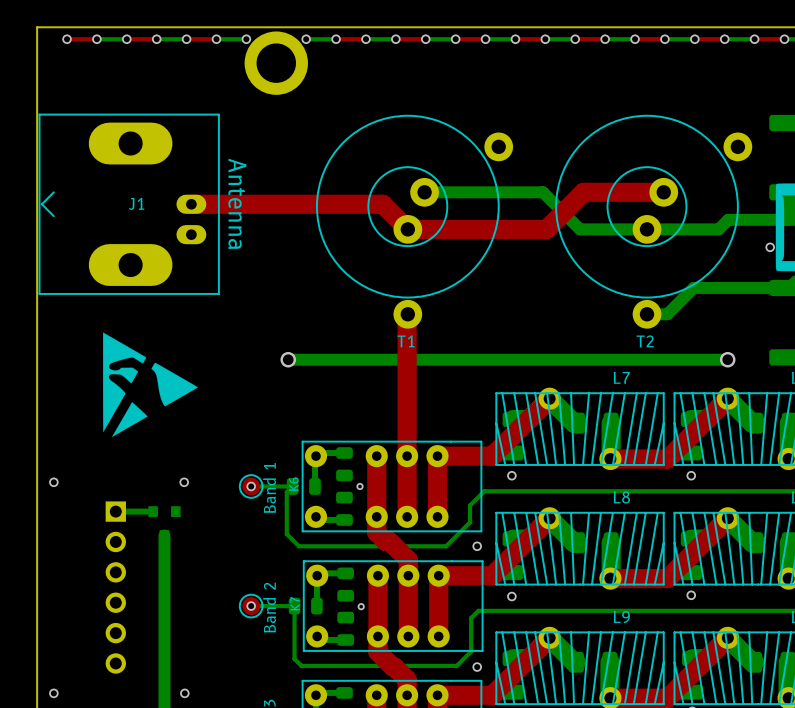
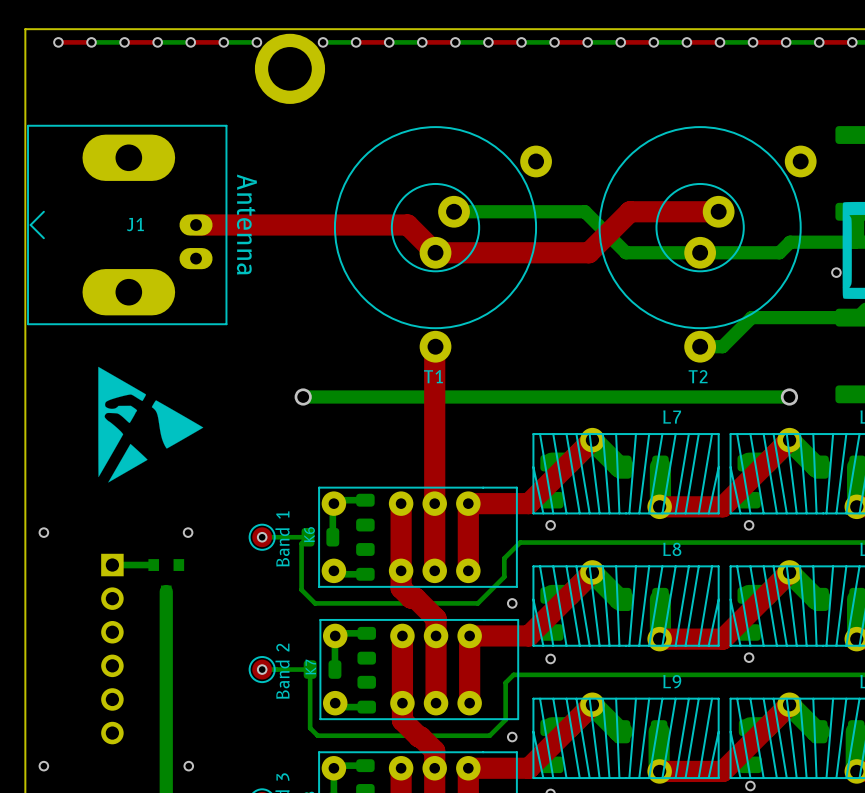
via: (360, 486) -> none
via: (361, 606) -> none

